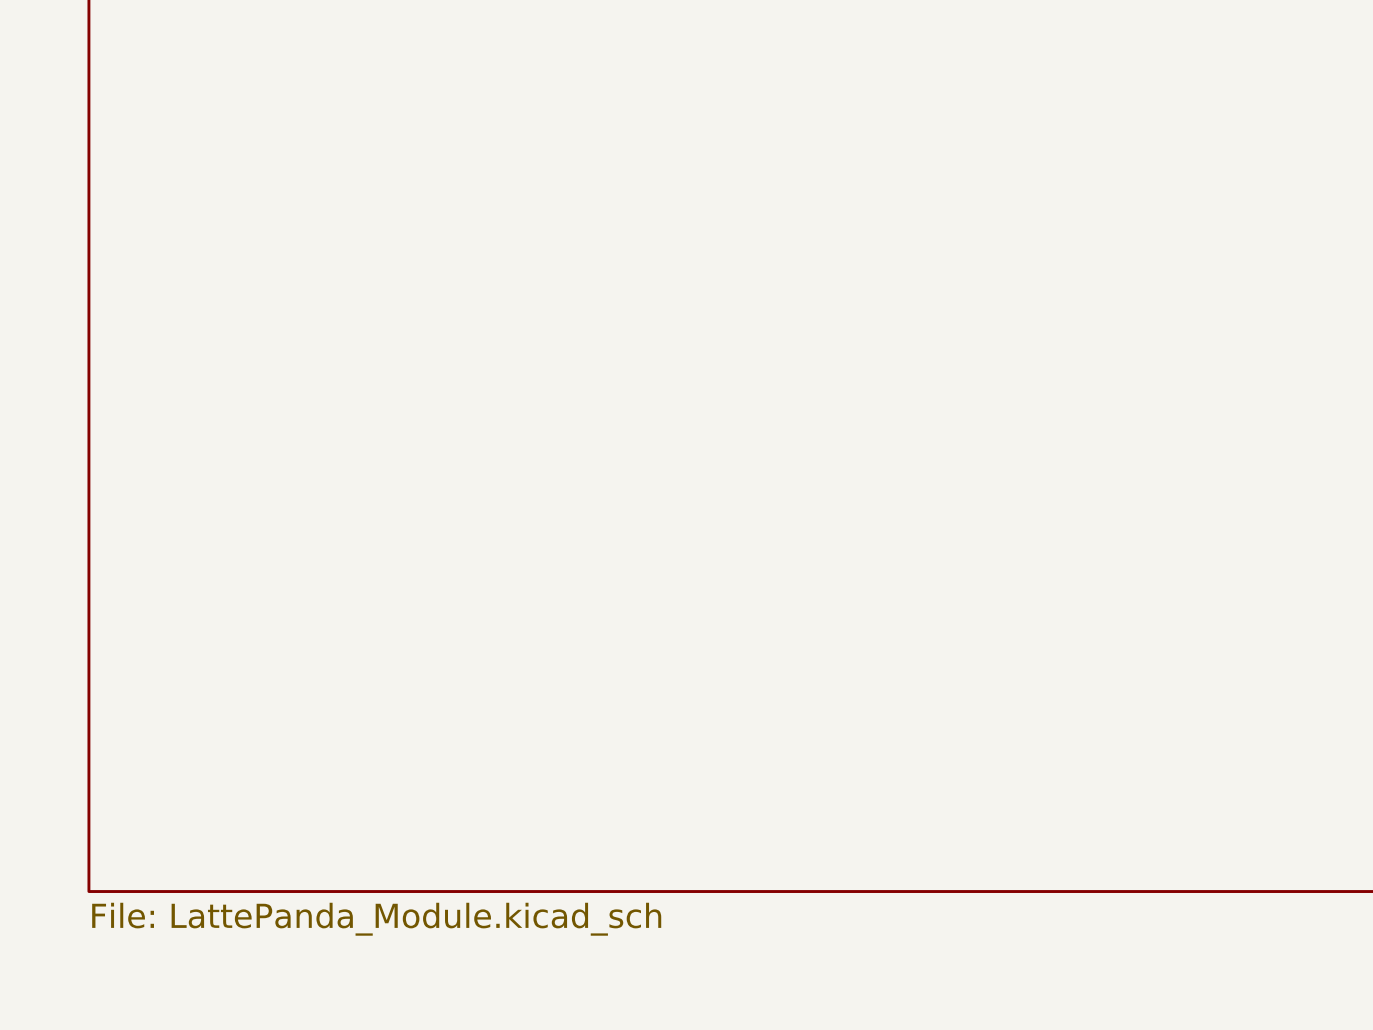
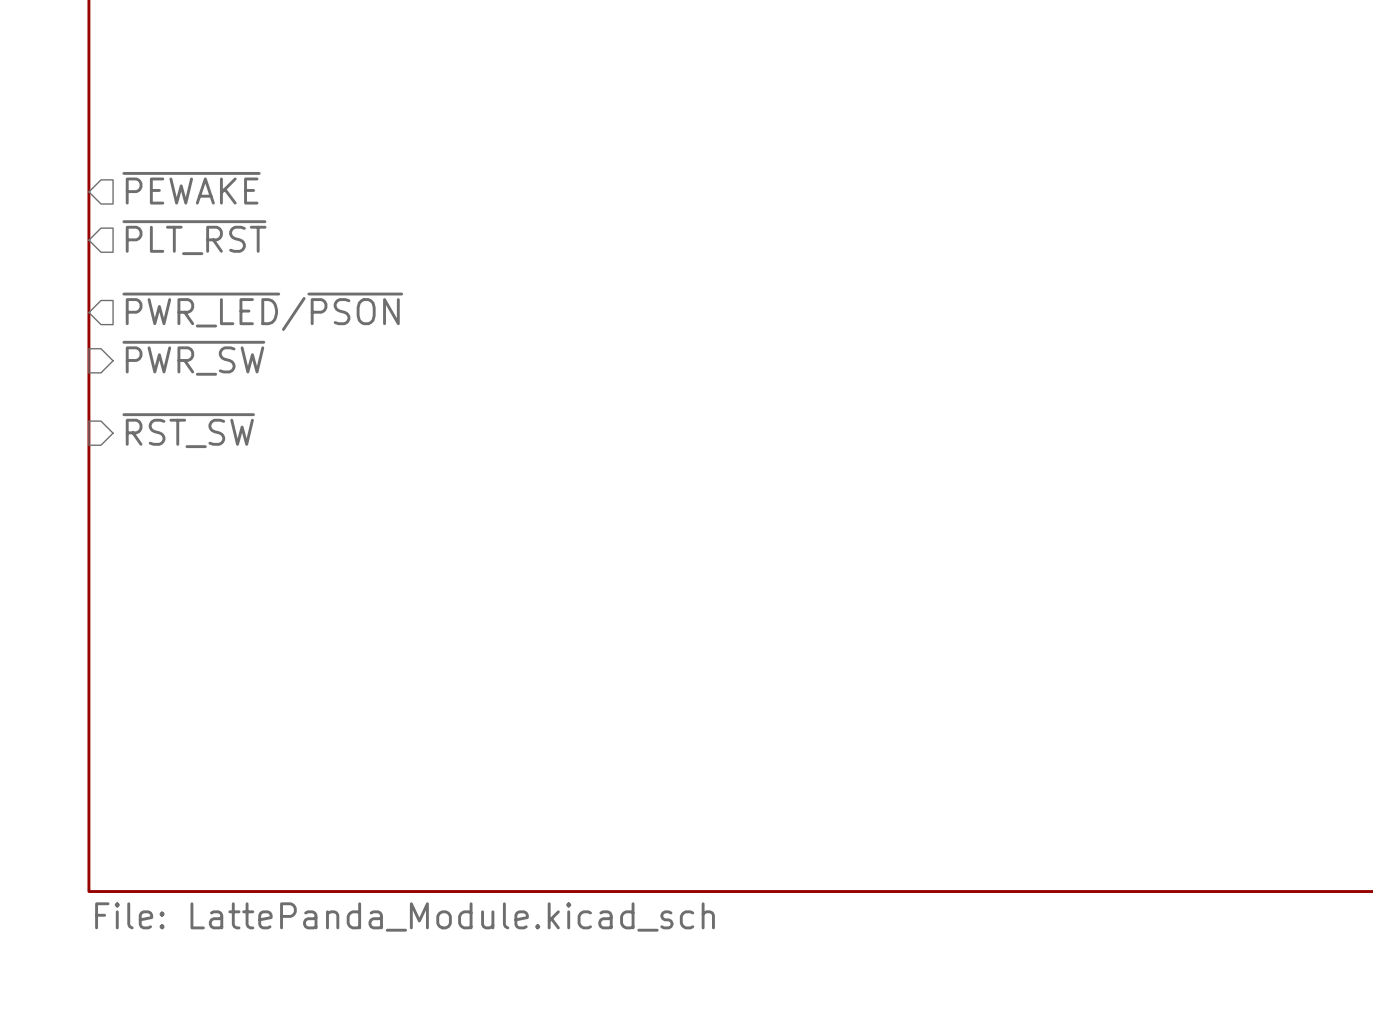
sheet pin: none -> ~{PEWAKE} (191, 188)
sheet pin: none -> ~{PLT_RST} (194, 237)
sheet pin: none -> ~{PWR_LED}/~{PSON} (262, 311)
sheet pin: none -> ~{PWR_SW} (193, 358)
sheet pin: none -> ~{RST_SW} (188, 430)

